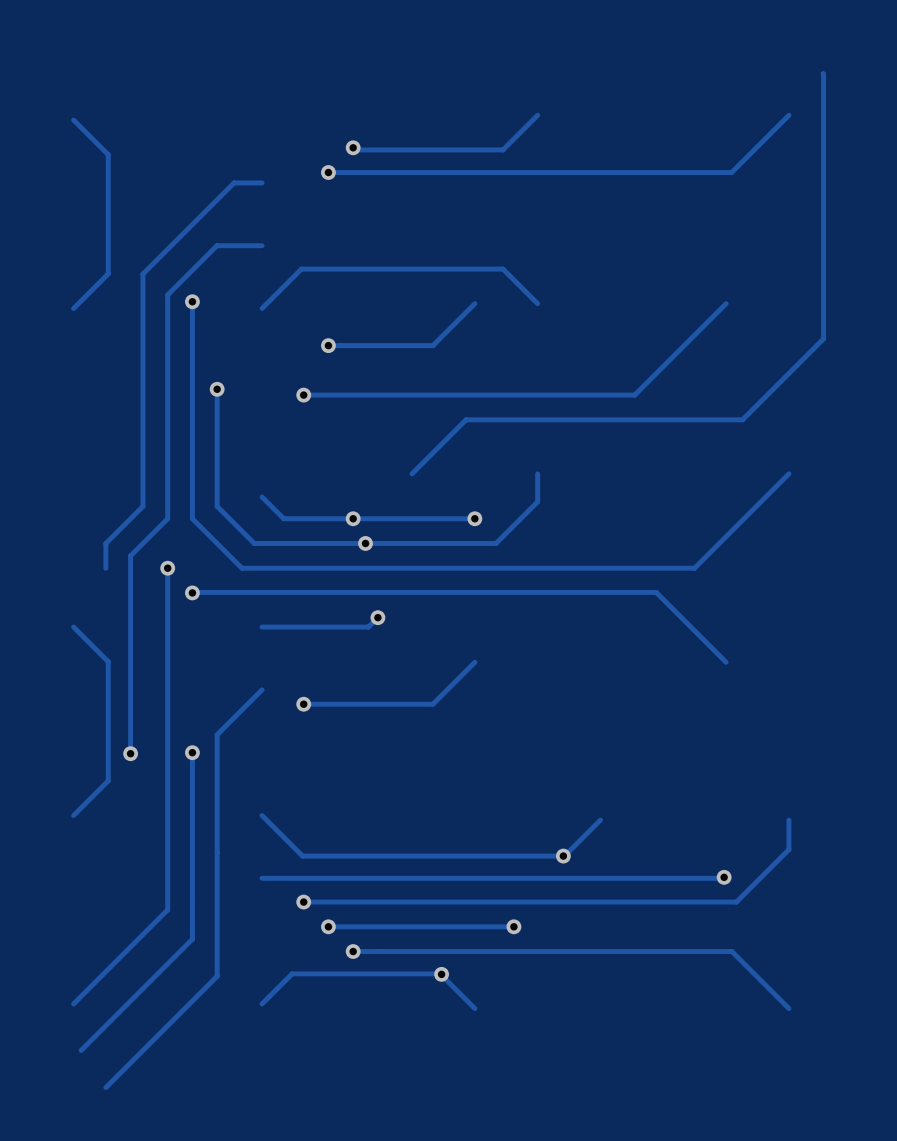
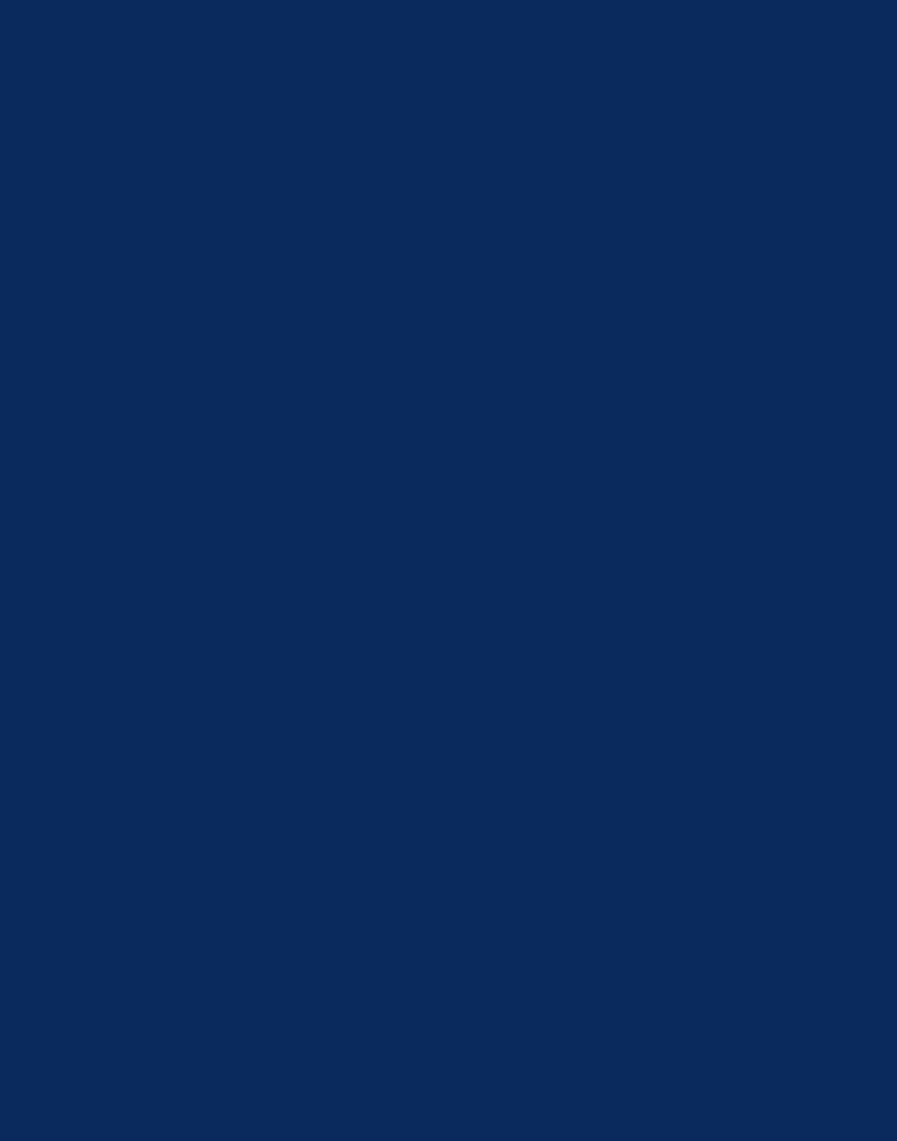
track: (823, 73) (823, 338) (742, 419) (466, 419) (412, 473) -> none
track: (537, 115) (503, 149) (355, 149) (353, 147) -> none
track: (788, 115) (731, 172) (328, 172) -> none
track: (73, 120) (108, 154) (108, 273) (73, 308) -> none
via: (353, 147) -> none
via: (328, 172) -> none
track: (262, 182) (234, 182) (142, 274) (142, 506) (105, 543) (105, 568) -> none
track: (262, 245) (216, 245) (167, 294) (167, 518) (130, 555) (130, 753) -> none
track: (192, 301) (192, 518) (241, 568) (694, 568) (788, 473) -> none
via: (192, 301) -> none
track: (474, 303) (432, 345) (328, 345) -> none
track: (537, 303) (503, 269) (301, 269) (262, 308) -> none
track: (726, 303) (634, 395) (303, 395) -> none
via: (328, 345) -> none
track: (217, 389) (217, 506) (254, 543) (496, 543) (537, 501) (537, 473) -> none
via: (217, 389) -> none
via: (303, 395) -> none
track: (262, 496) (283, 518) (474, 518) -> none
via: (353, 518) -> none
via: (474, 518) -> none
via: (365, 543) -> none
track: (167, 568) (167, 909) (73, 1003) -> none
via: (167, 568) -> none
track: (192, 592) (656, 592) (726, 662) -> none
via: (192, 592) -> none
track: (377, 617) (368, 627) (262, 627) -> none
via: (377, 617) -> none
track: (73, 627) (108, 661) (108, 780) (73, 815) -> none
track: (474, 662) (432, 704) (303, 704) -> none
track: (262, 689) (217, 734) (217, 976) (105, 1087) -> none
via: (303, 704) -> none
track: (192, 752) (192, 939) (81, 1050) -> none
via: (192, 752) -> none
via: (130, 753) -> none
track: (262, 815) (302, 856) (563, 856) (600, 820) -> none
track: (788, 820) (788, 849) (736, 902) (303, 902) -> none
via: (563, 856) -> none
track: (724, 877) (262, 878) -> none
via: (724, 877) -> none
via: (303, 902) -> none
track: (328, 926) (513, 926) -> none
via: (328, 926) -> none
via: (513, 926) -> none
track: (353, 951) (731, 951) (788, 1008) -> none
via: (353, 951) -> none
via: (441, 974) -> none
track: (262, 1003) (292, 973) (441, 973) (474, 1008) -> none

